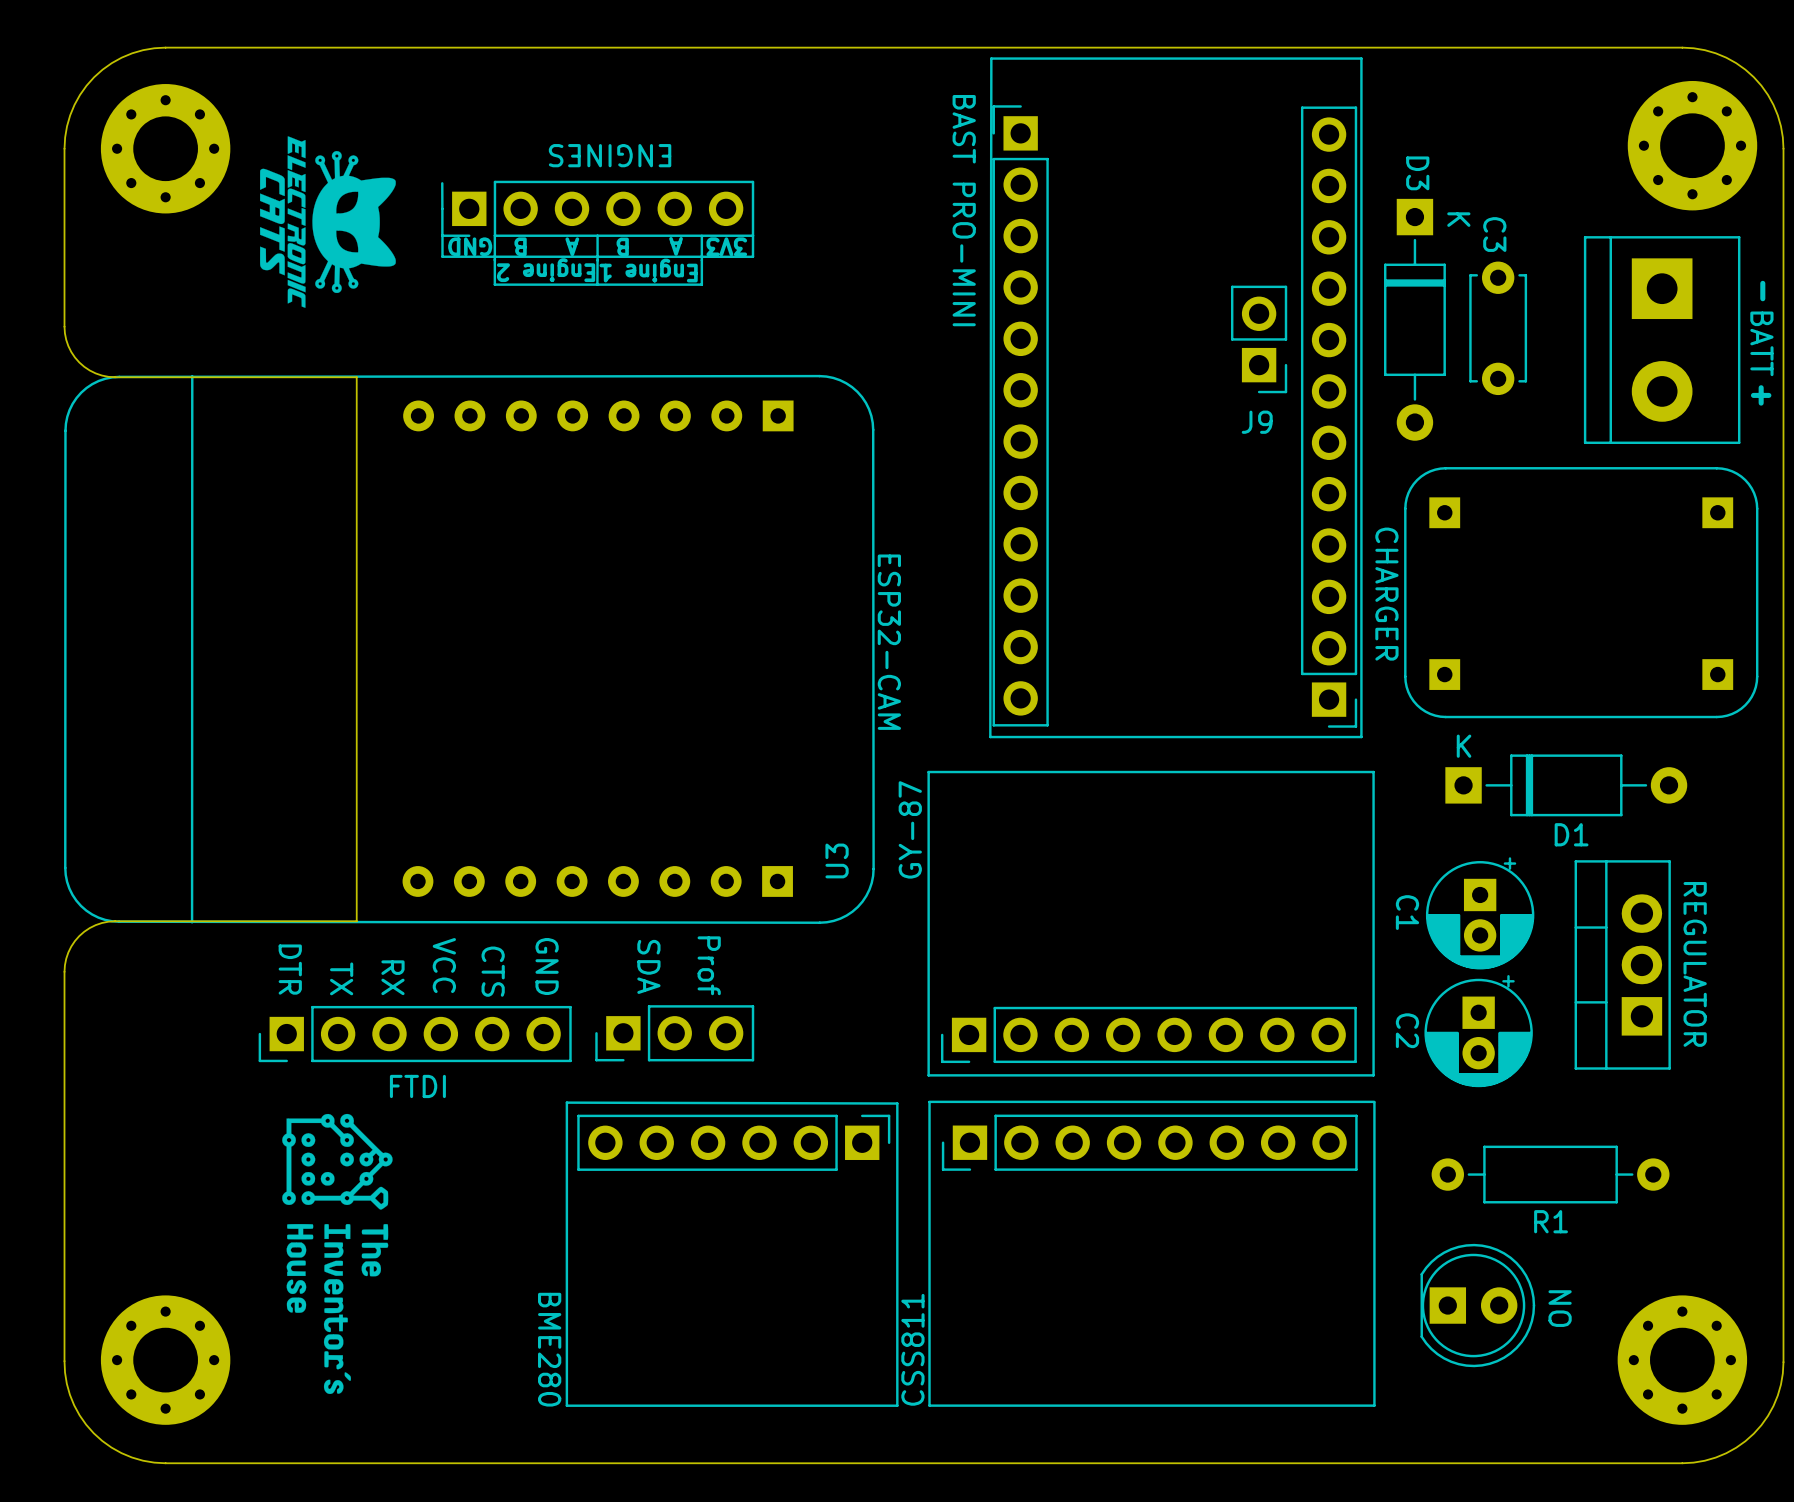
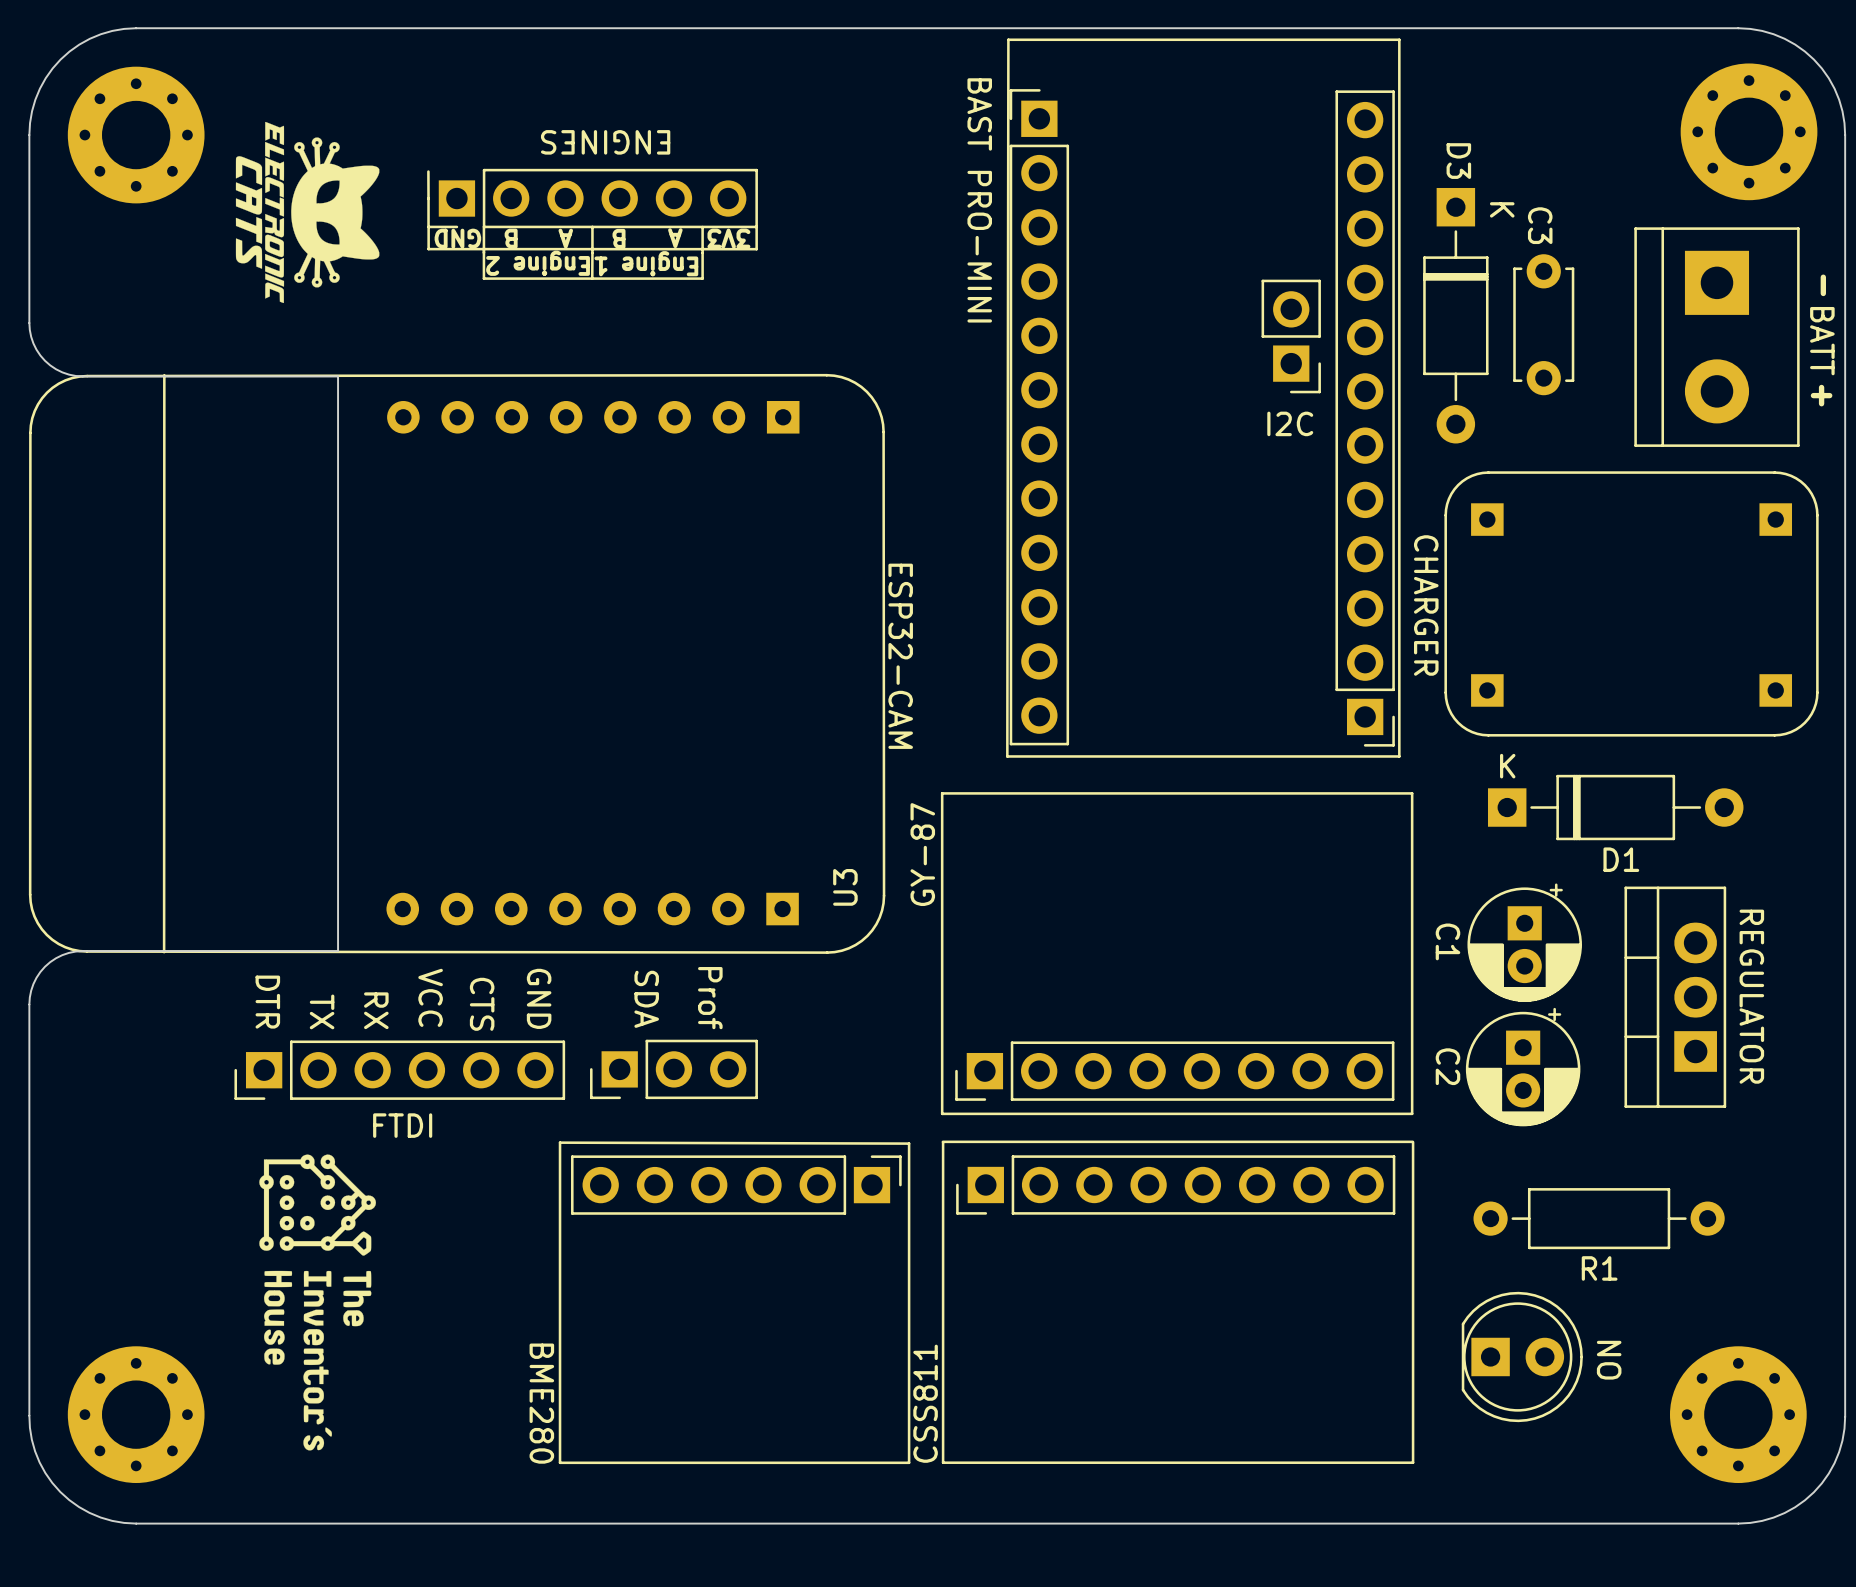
J9 name: J9 (1257, 422) -> I2C (1290, 423)

